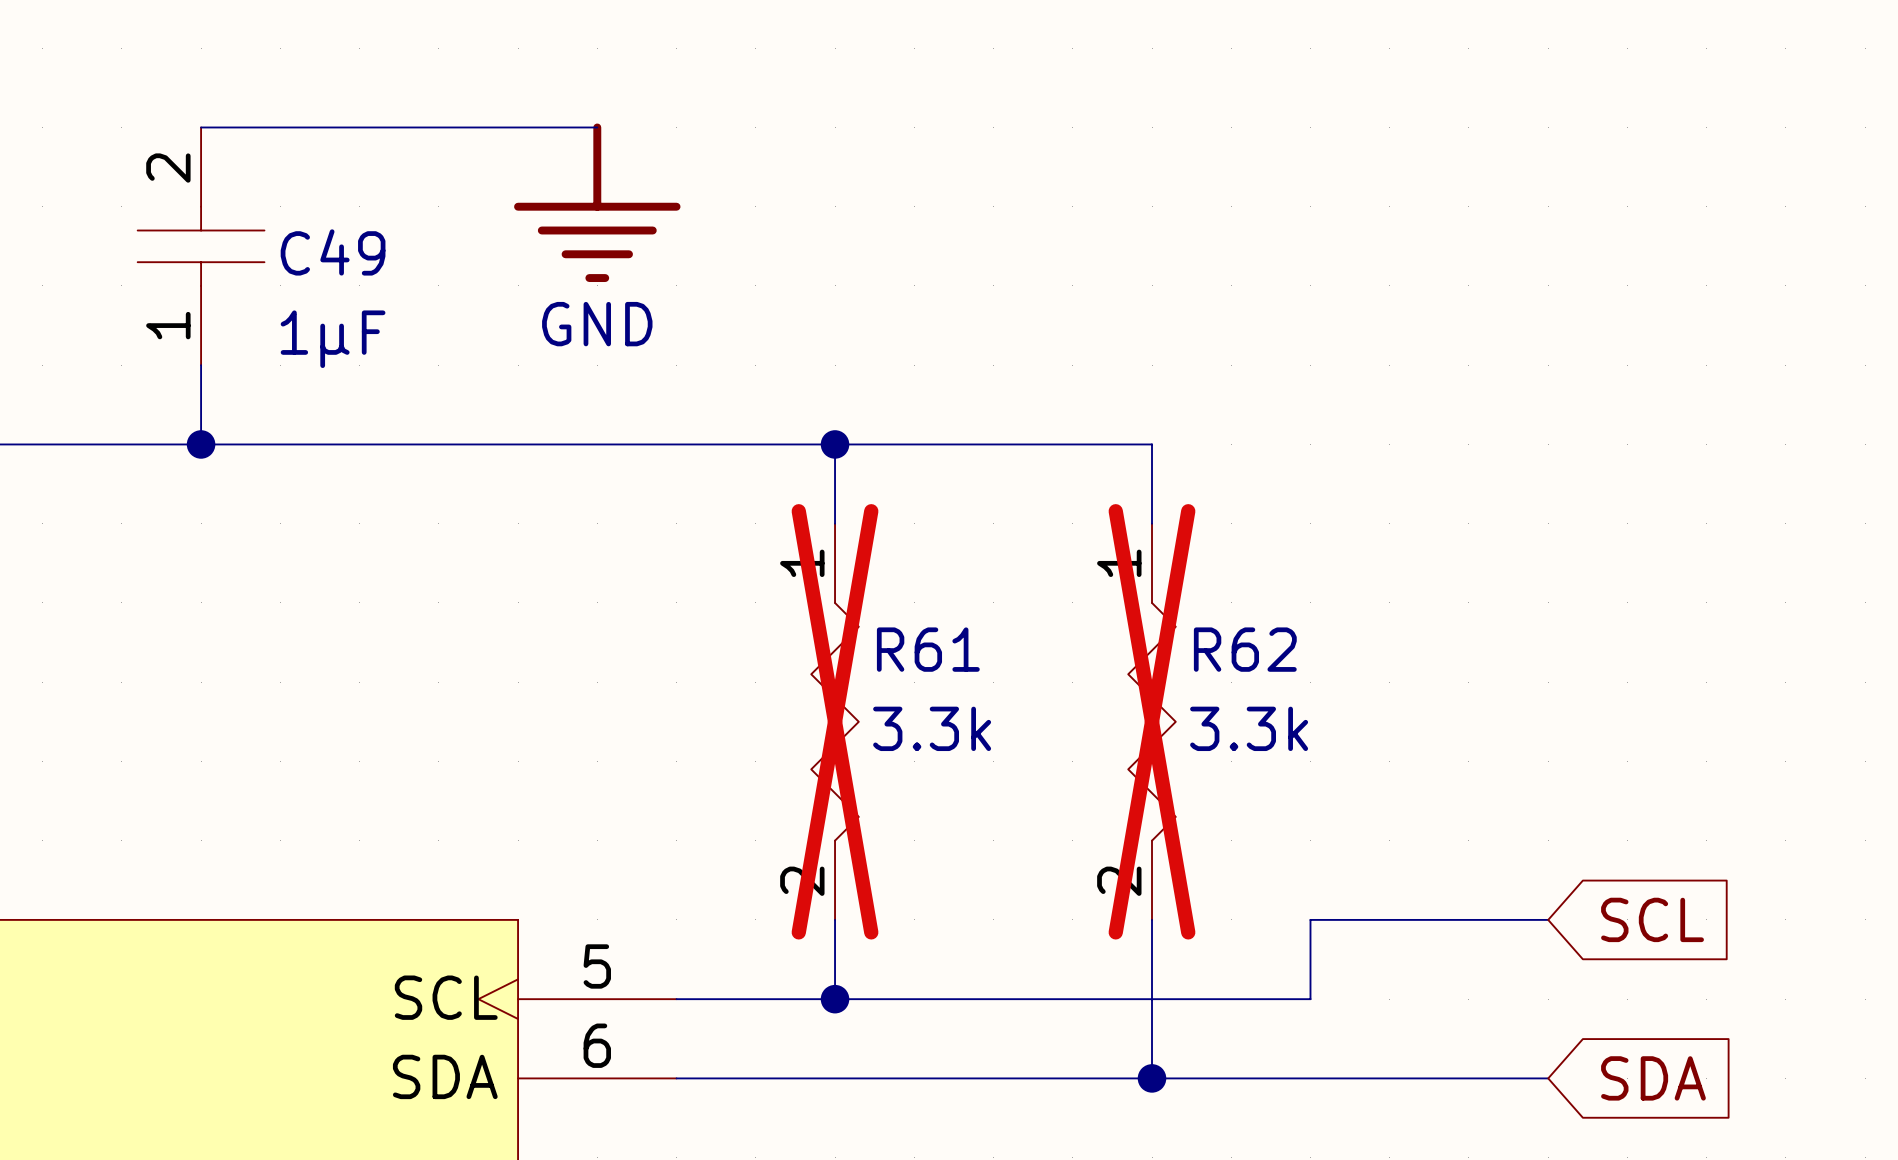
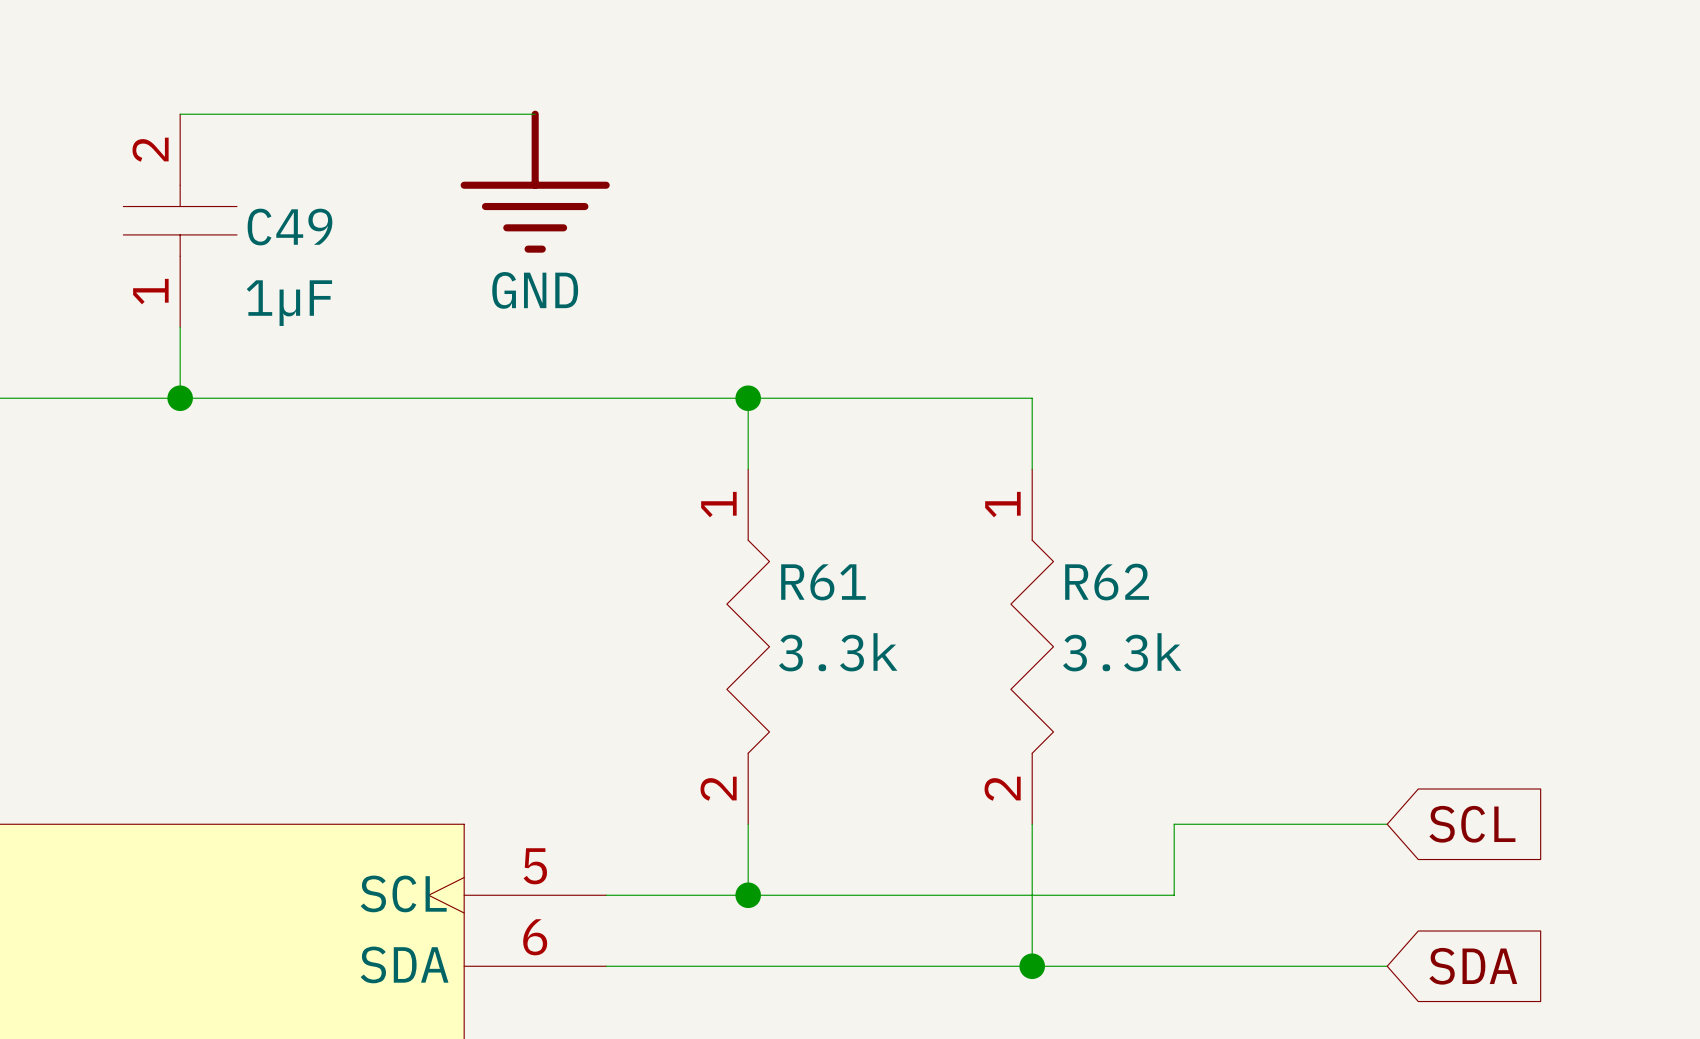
R61 do-not-place cross: (835, 721) -> none
R62 do-not-place cross: (1152, 721) -> none

